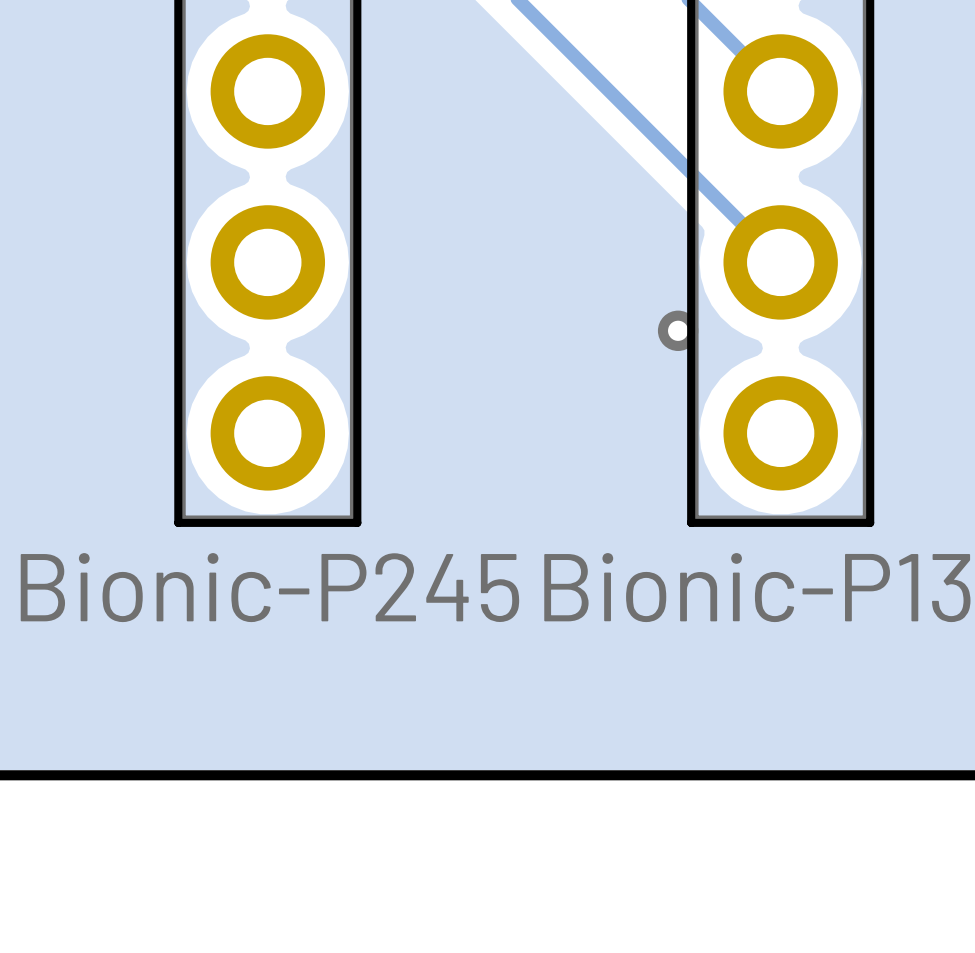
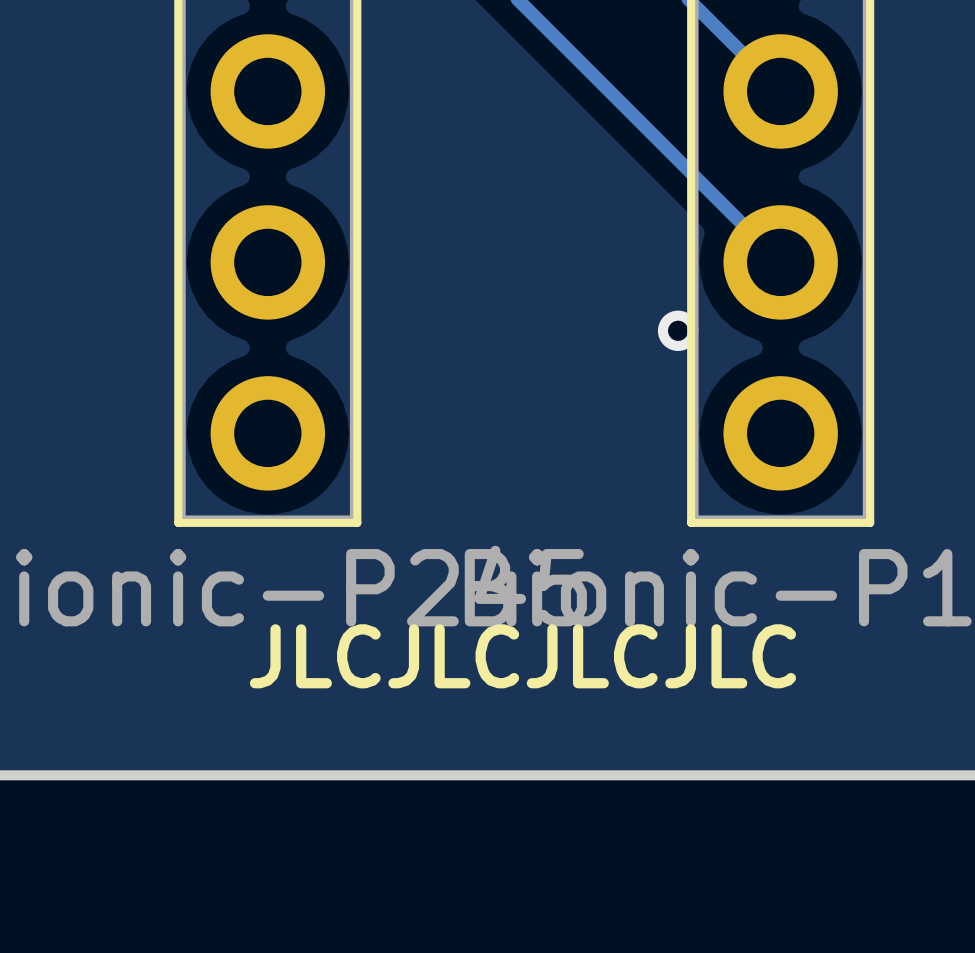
text: none -> JLCJLCJLCJLC (522, 656)

